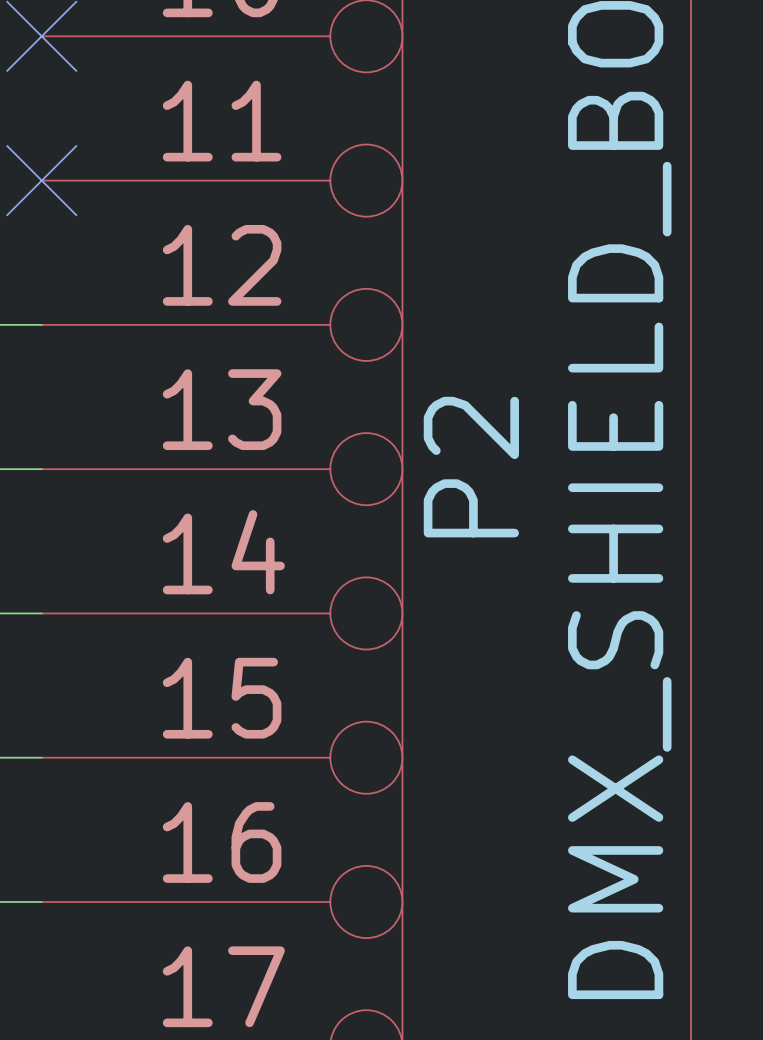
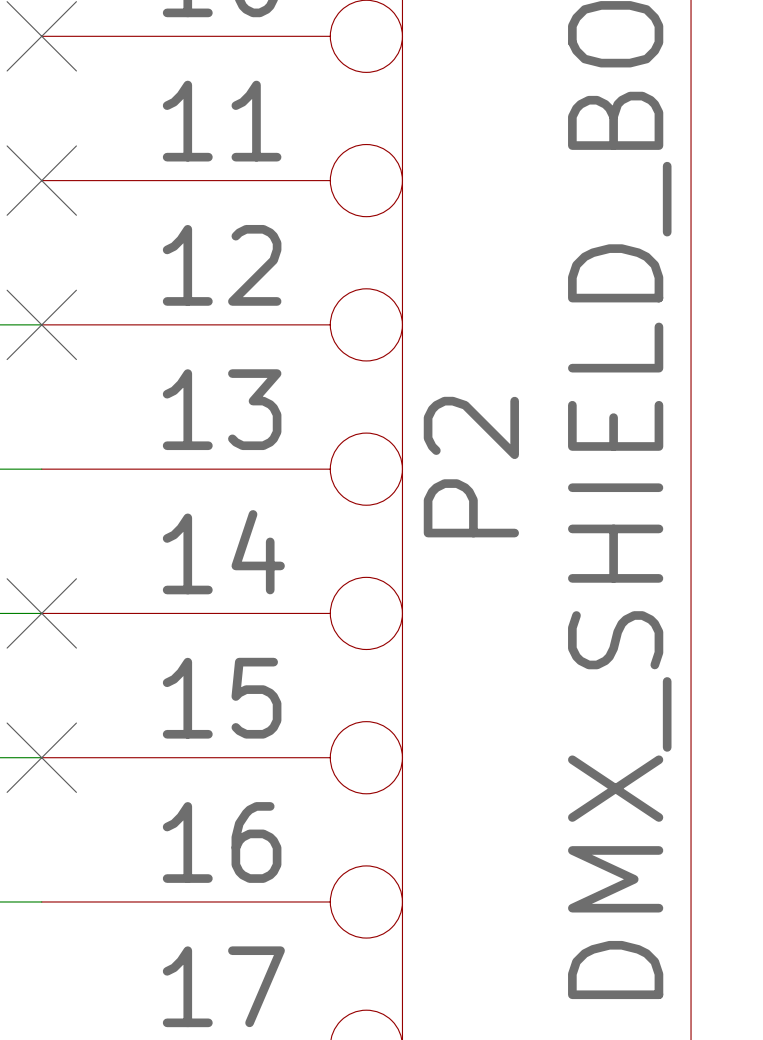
no-connect mark: none -> (41, 324)
no-connect mark: none -> (41, 613)
no-connect mark: none -> (41, 757)

